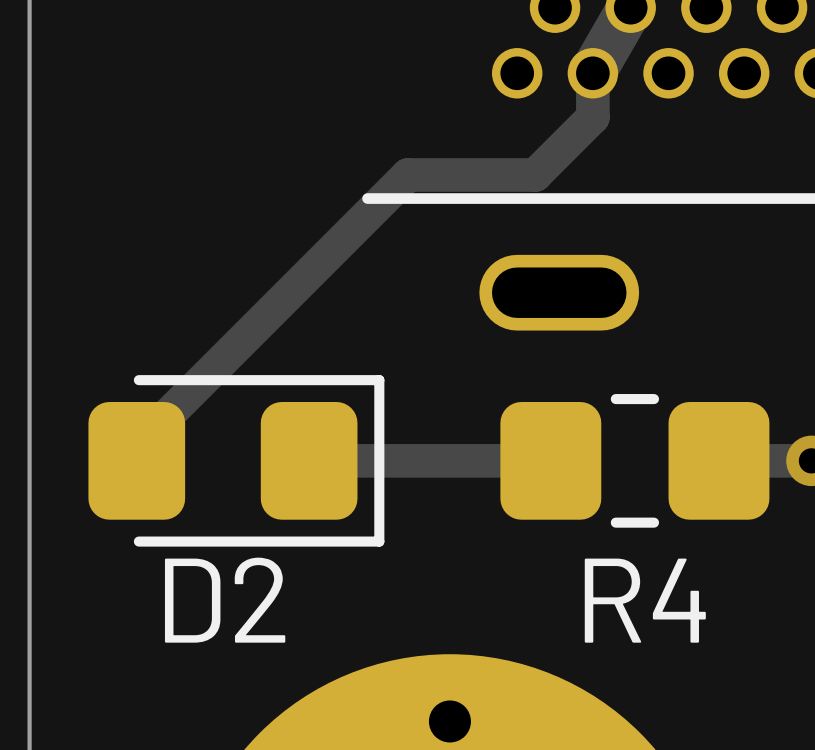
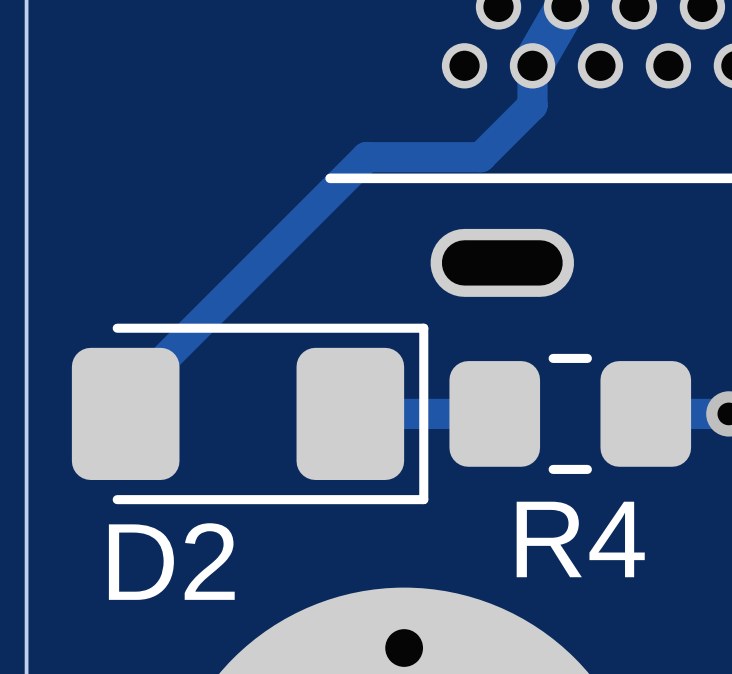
D2 footprint: [88, 375, 385, 547] -> [71, 323, 429, 505]

